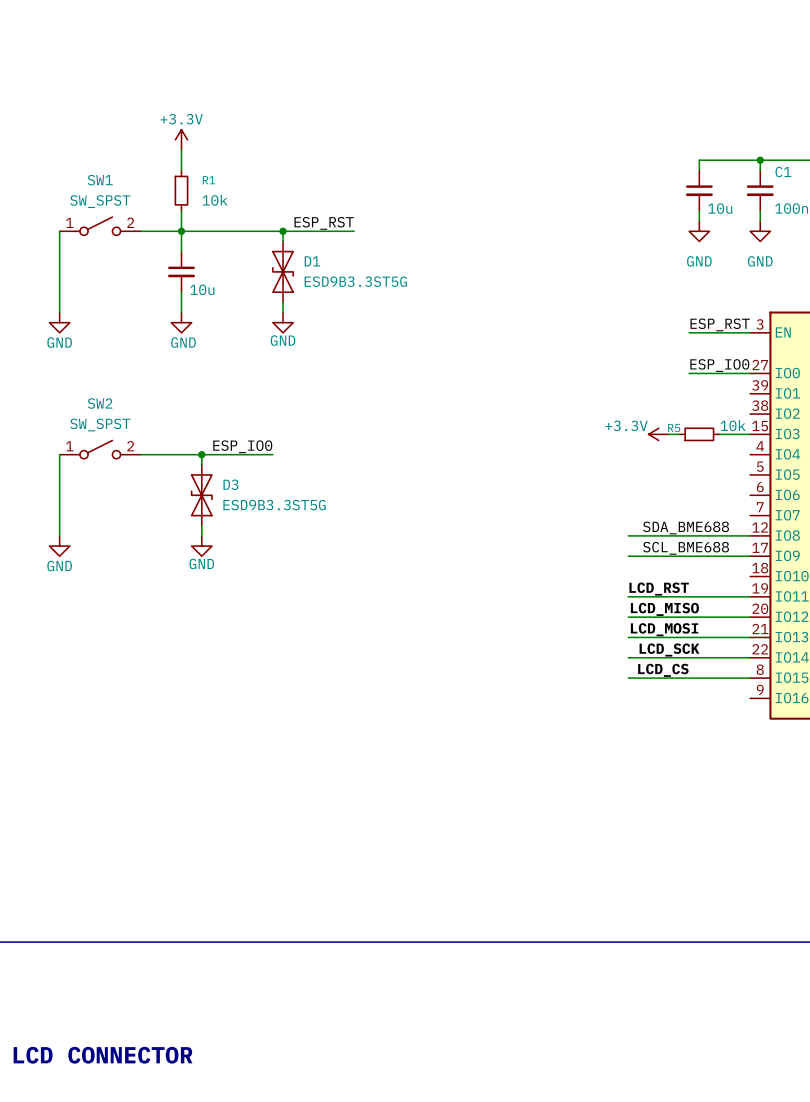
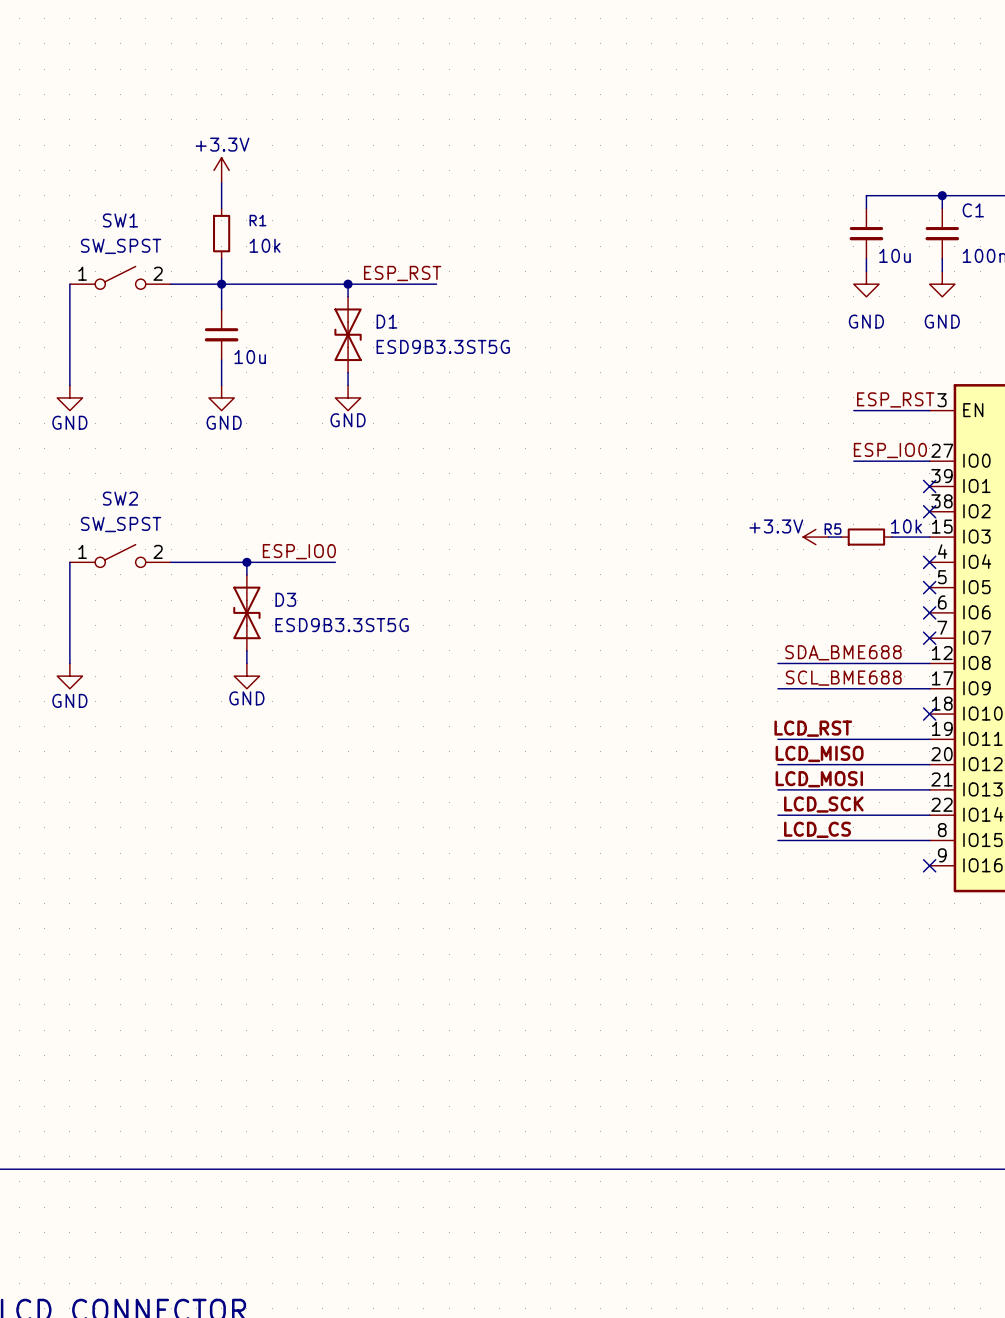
no-connect mark: none -> (929, 486)
no-connect mark: none -> (929, 511)
no-connect mark: none -> (929, 562)
no-connect mark: none -> (929, 587)
no-connect mark: none -> (929, 612)
no-connect mark: none -> (929, 638)
no-connect mark: none -> (929, 714)
no-connect mark: none -> (929, 865)

